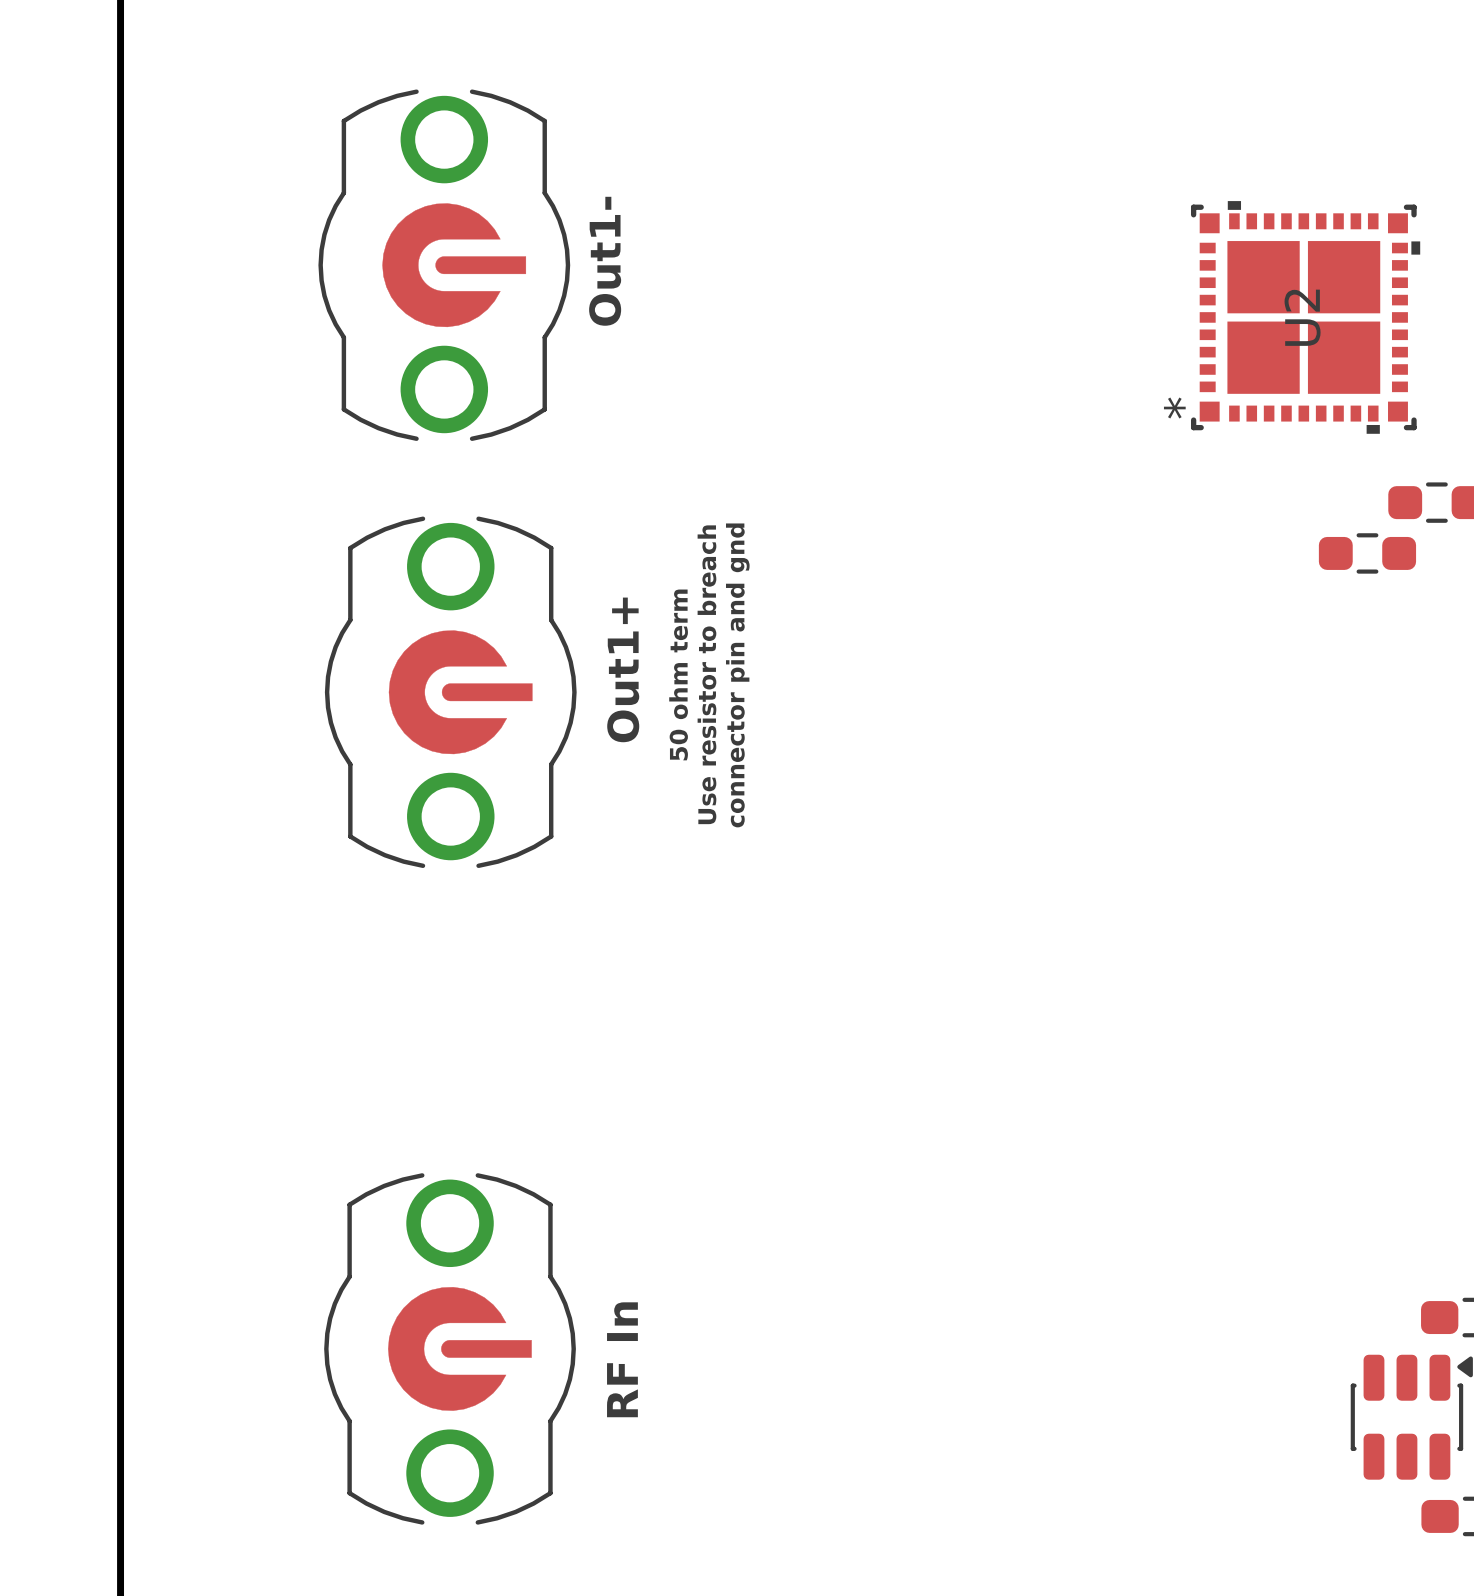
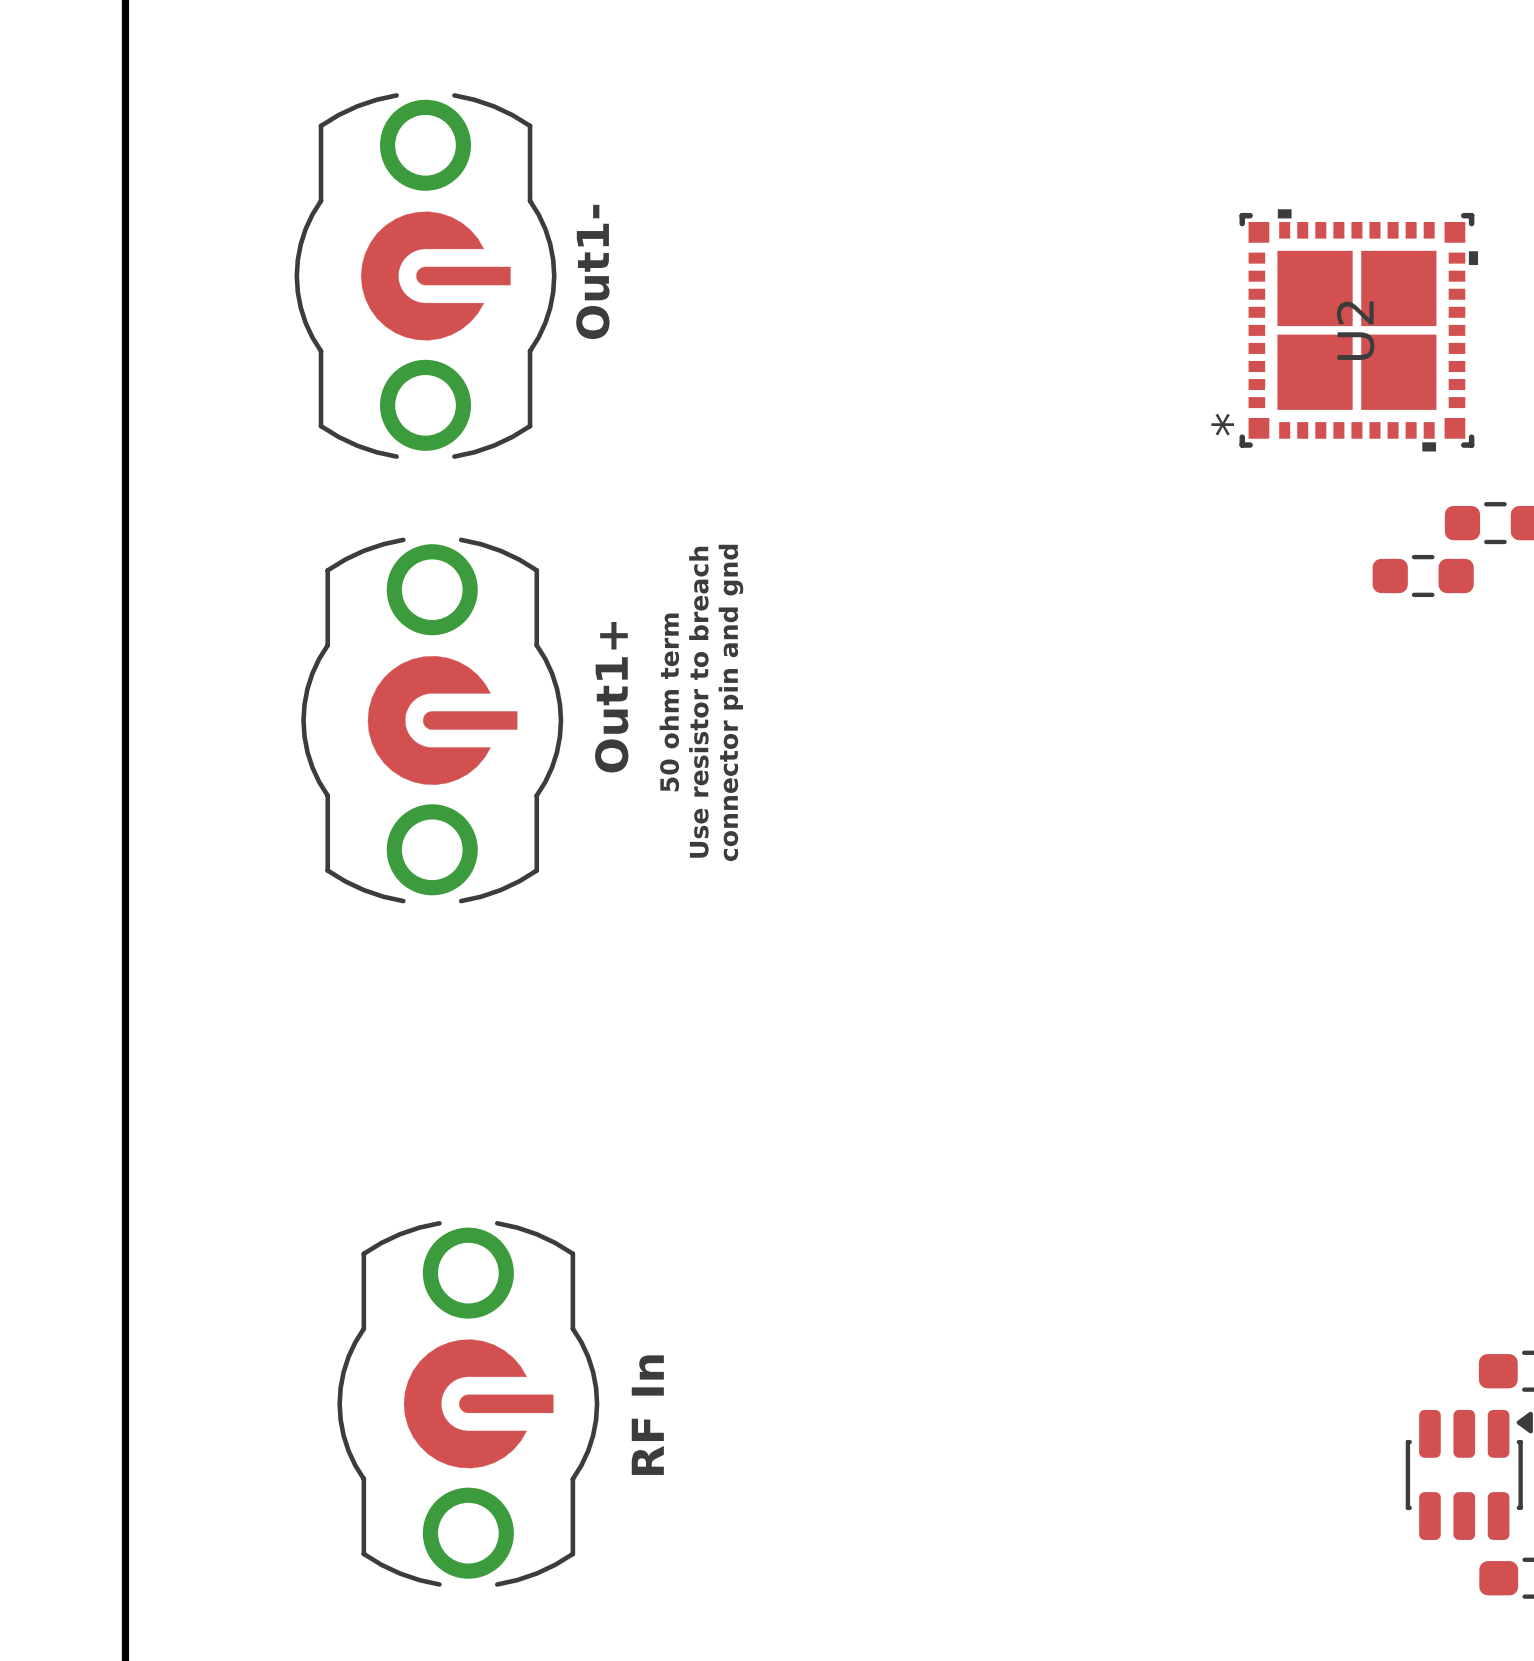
text position: Out1- (605, 261) -> Out1- (592, 271)
part position: (444, 265) -> (425, 276)
text position: Out1+ (623, 669) -> Out1+ (611, 697)
text: none -> 50 ohm term (669, 702)
text: 50 ohm term (678, 674) -> Use resistor to breach (698, 702)
text: Use resistor to breach (706, 674) -> connector pin and gnd (730, 702)
text: connector pin and gnd (737, 675) -> none
part position: (450, 692) -> (432, 720)

